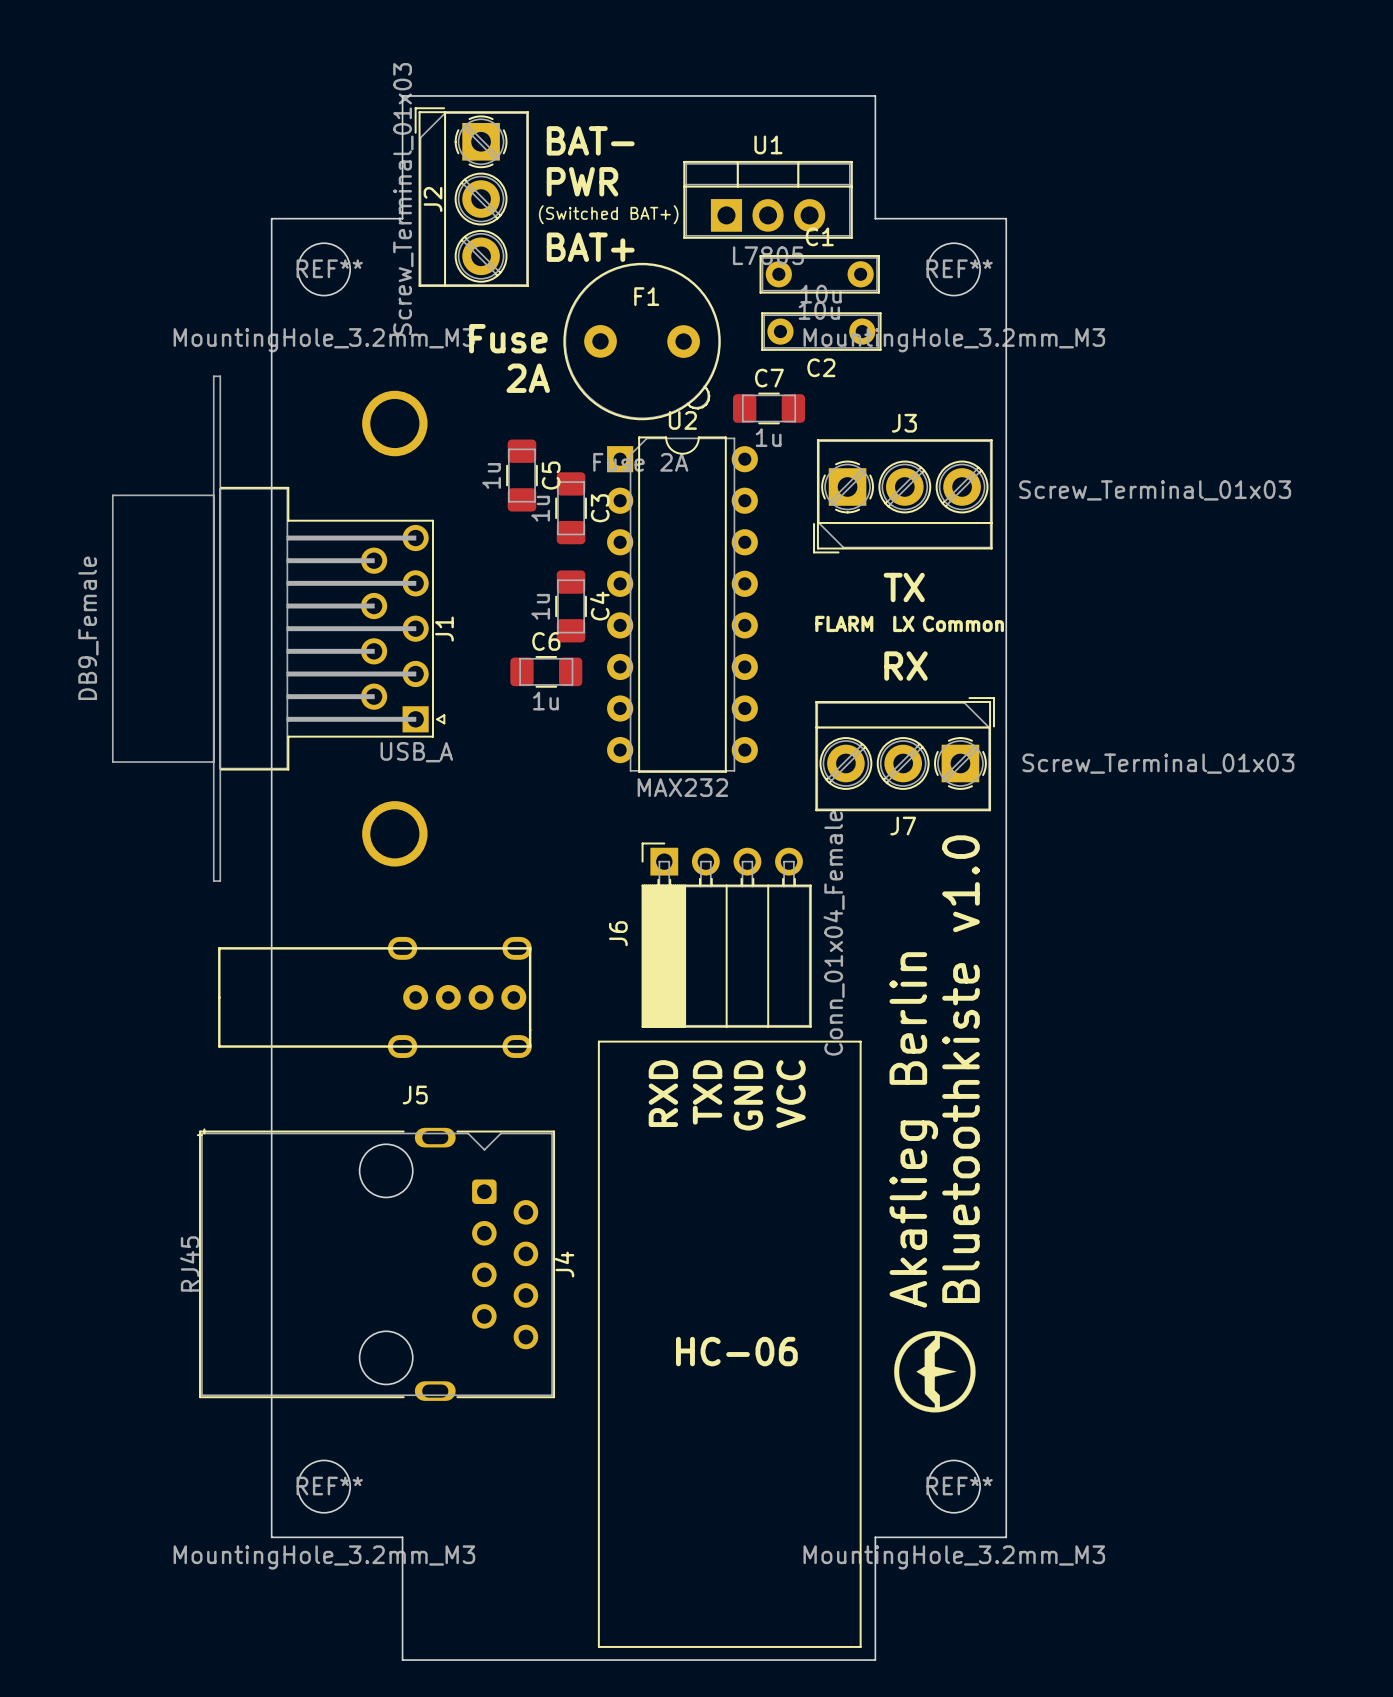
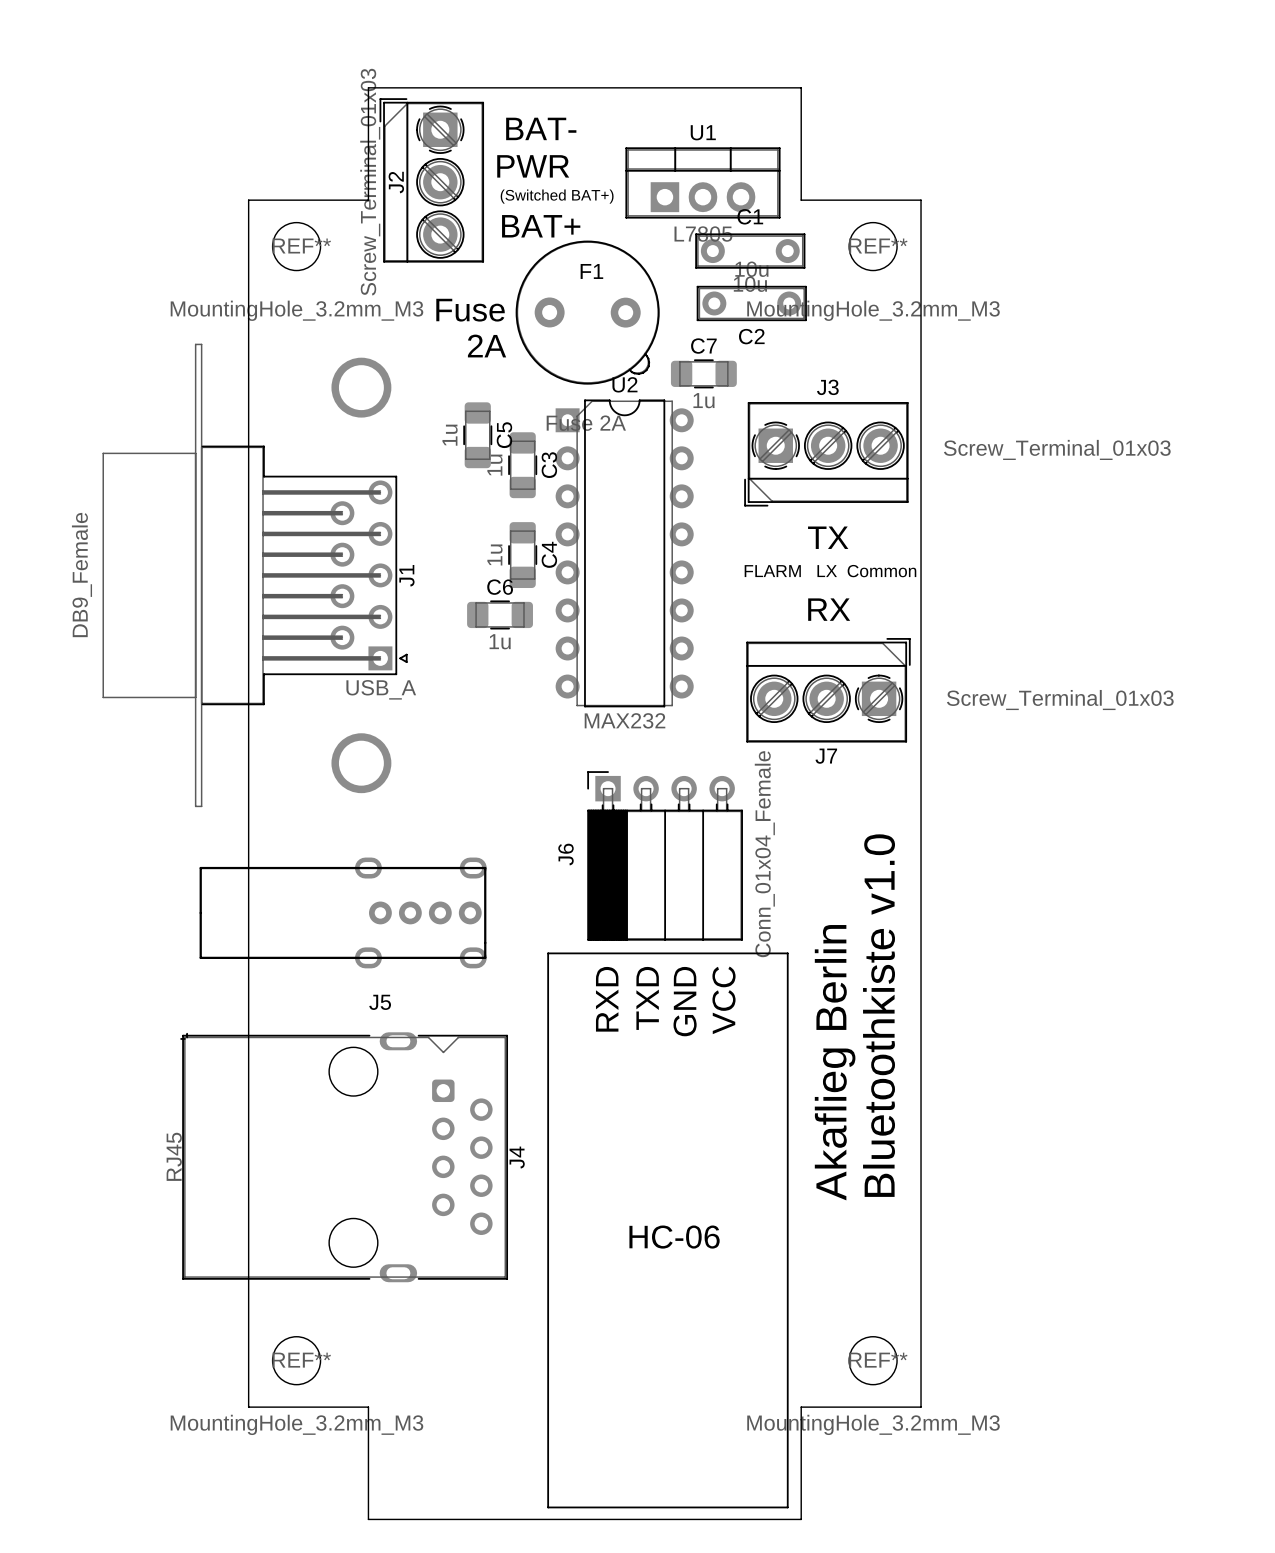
drawing: [894, 1330, 976, 1413] -> none

